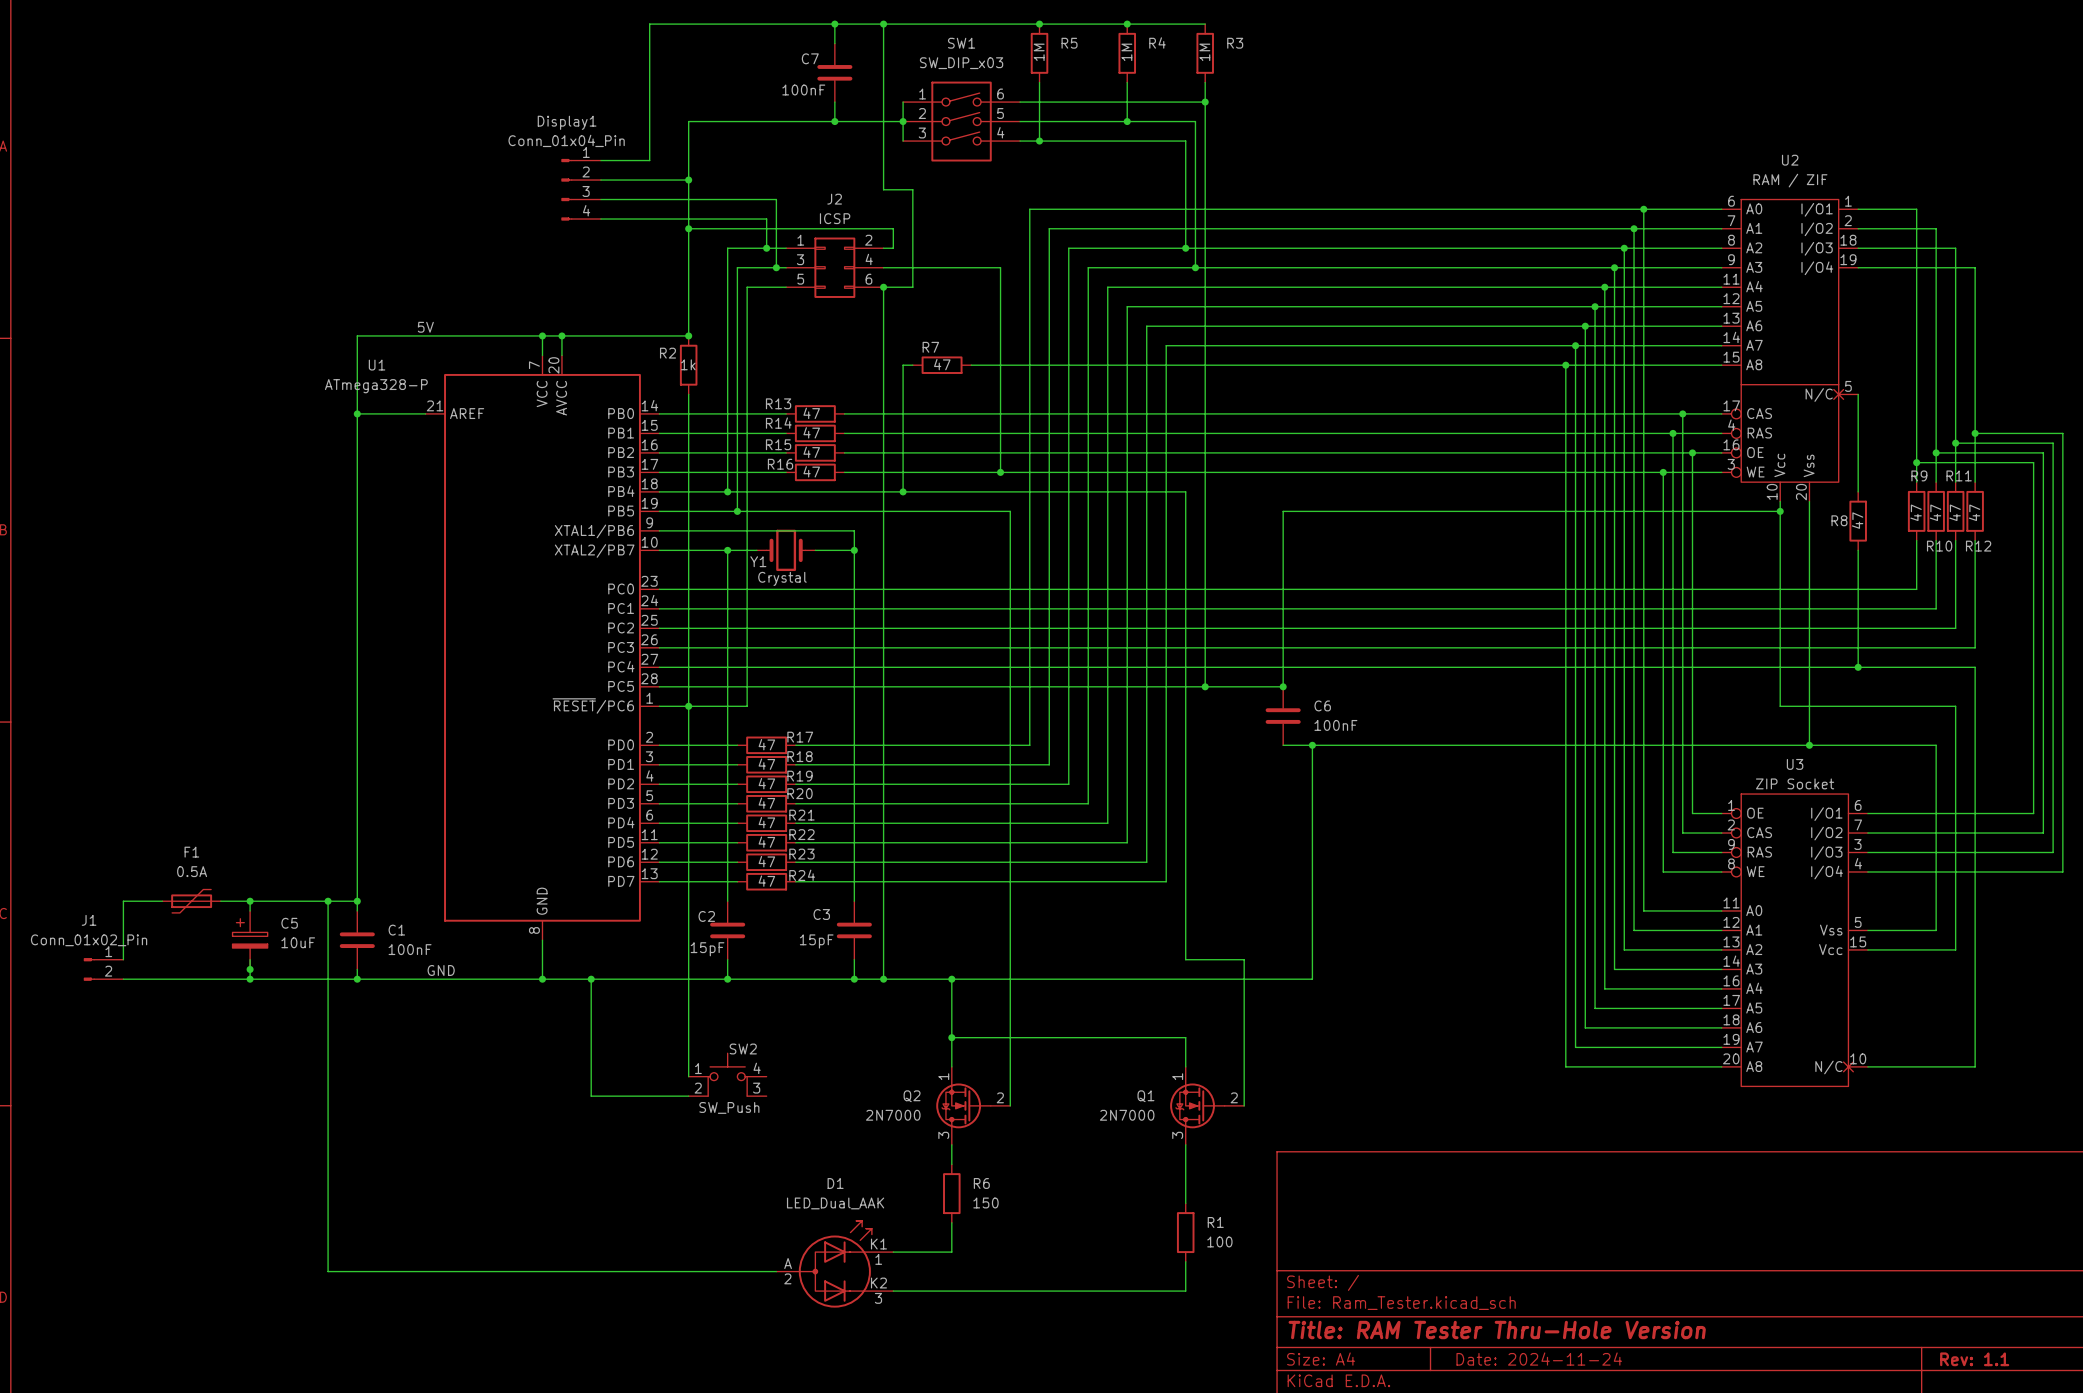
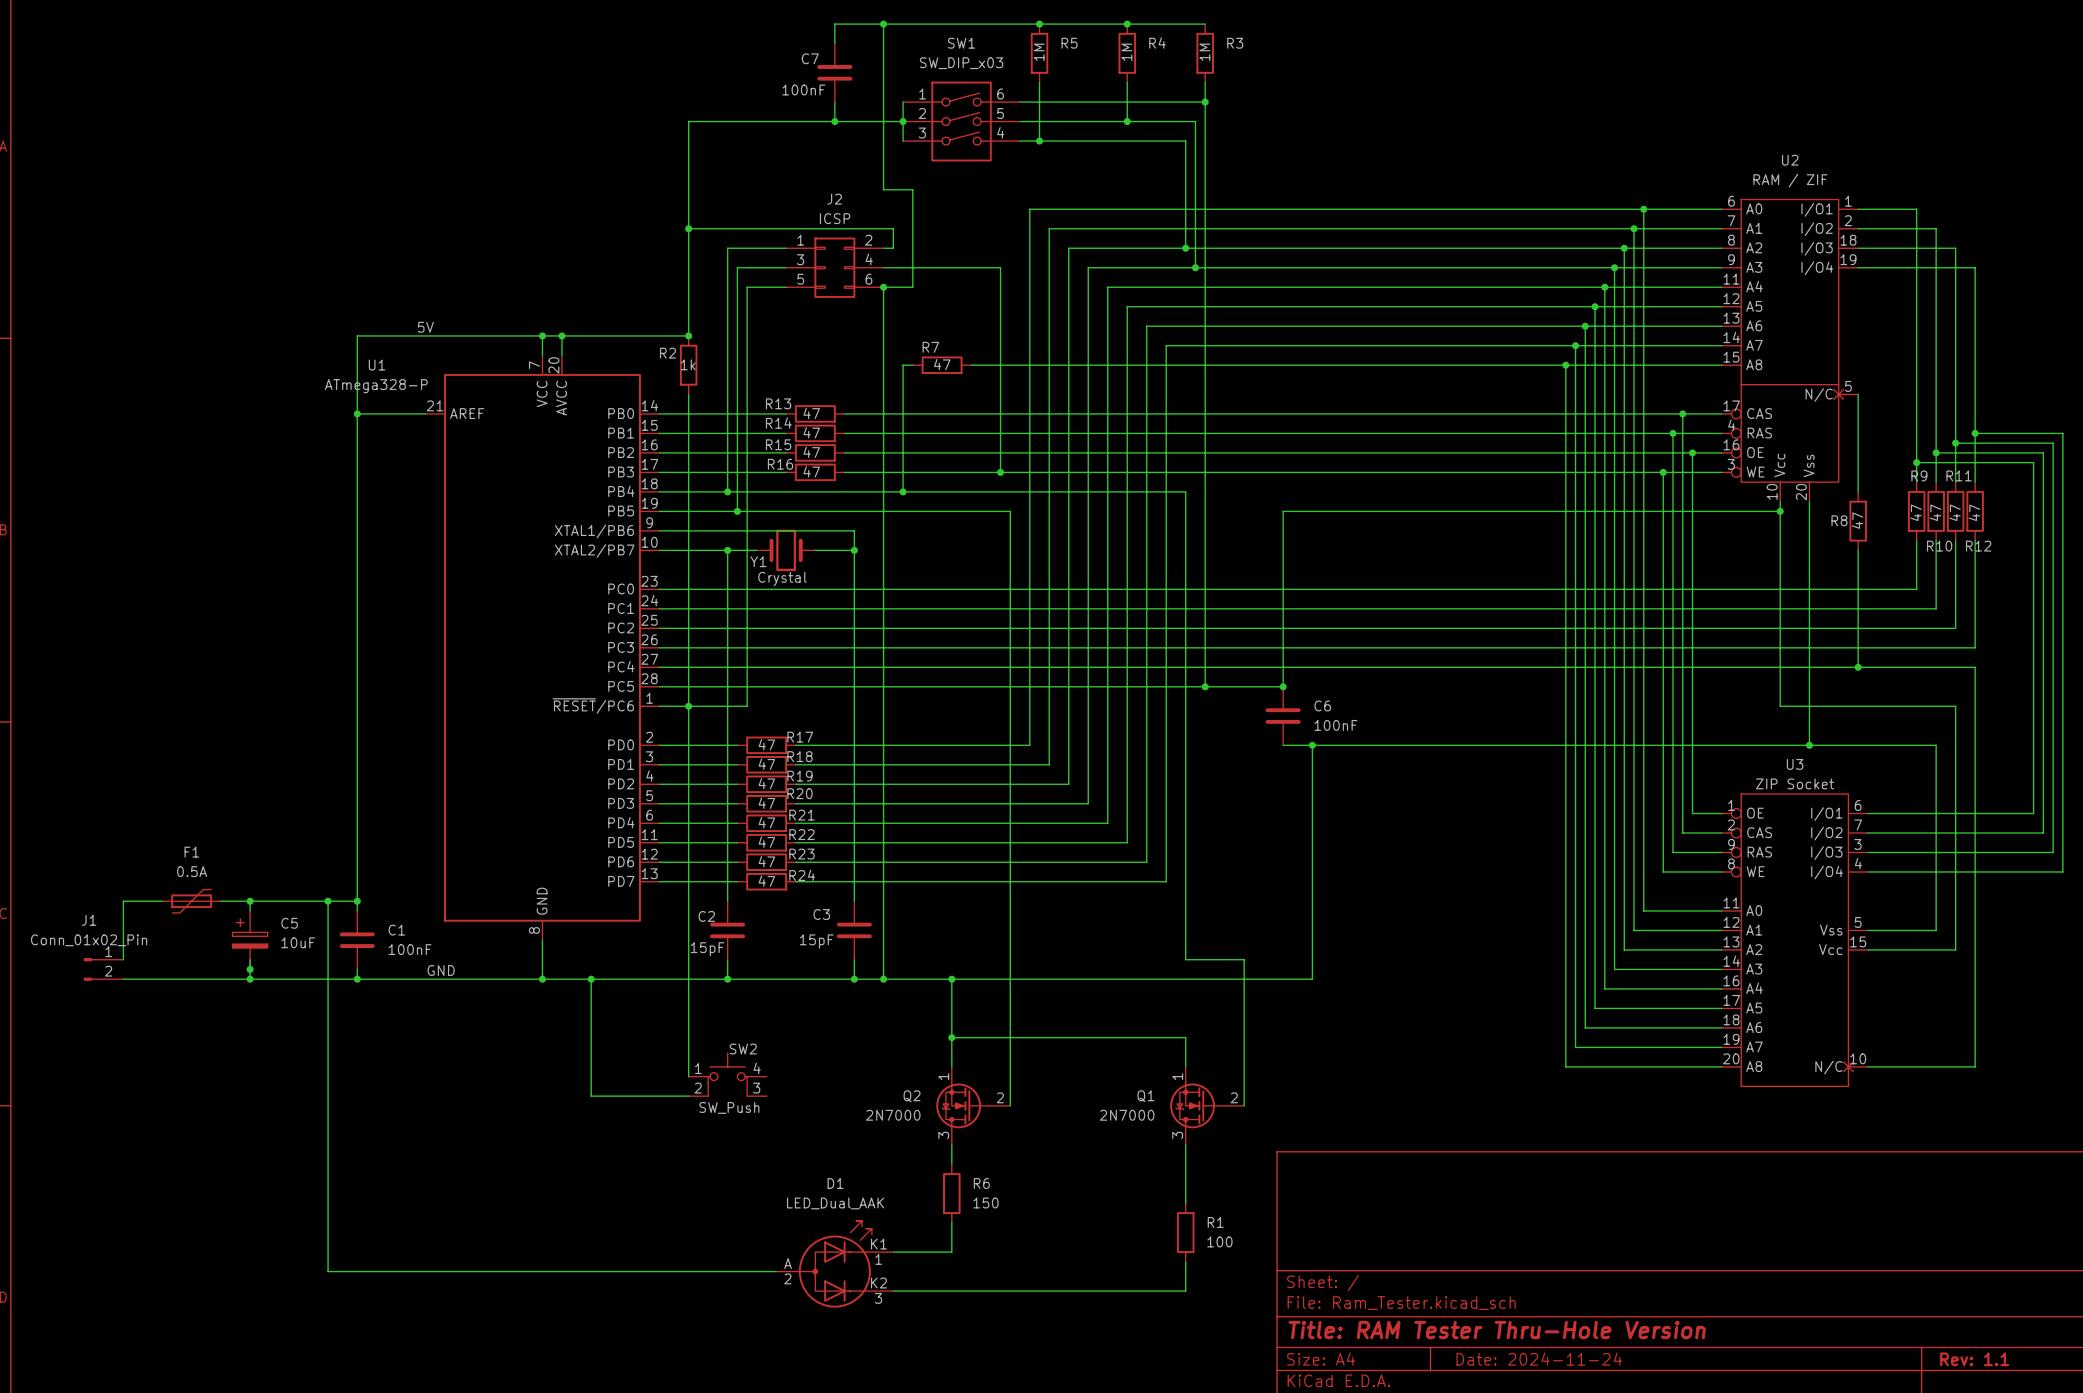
wire: (834, 24) (649, 24) (649, 160) (600, 160) -> none
junction: (834, 24) -> none
wire: (600, 180) (688, 180) -> none
junction: (688, 180) -> none
Display1: Conn_01x04_Pin (581, 189) -> none
wire: (600, 199) (776, 199) (776, 267) -> none
wire: (600, 219) (766, 219) (766, 248) -> none
junction: (766, 248) -> none
junction: (776, 267) -> none

